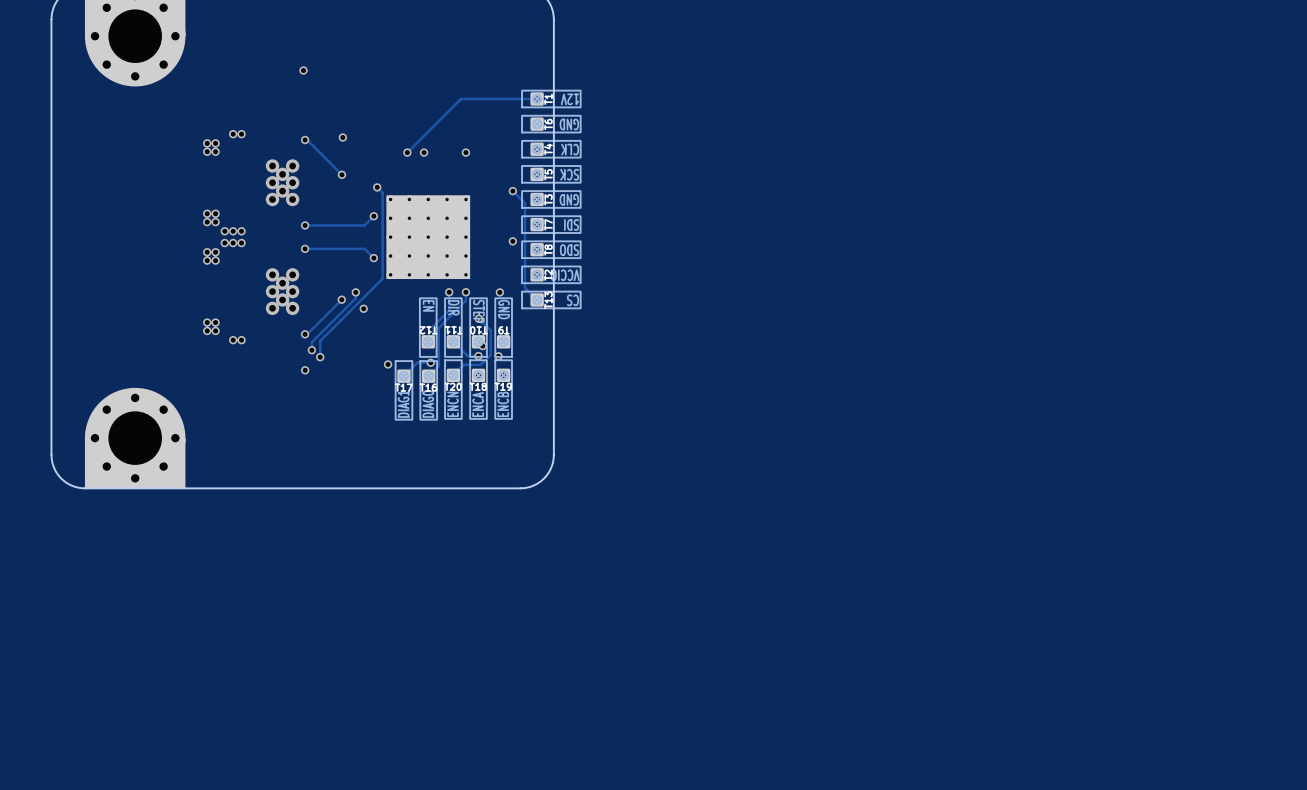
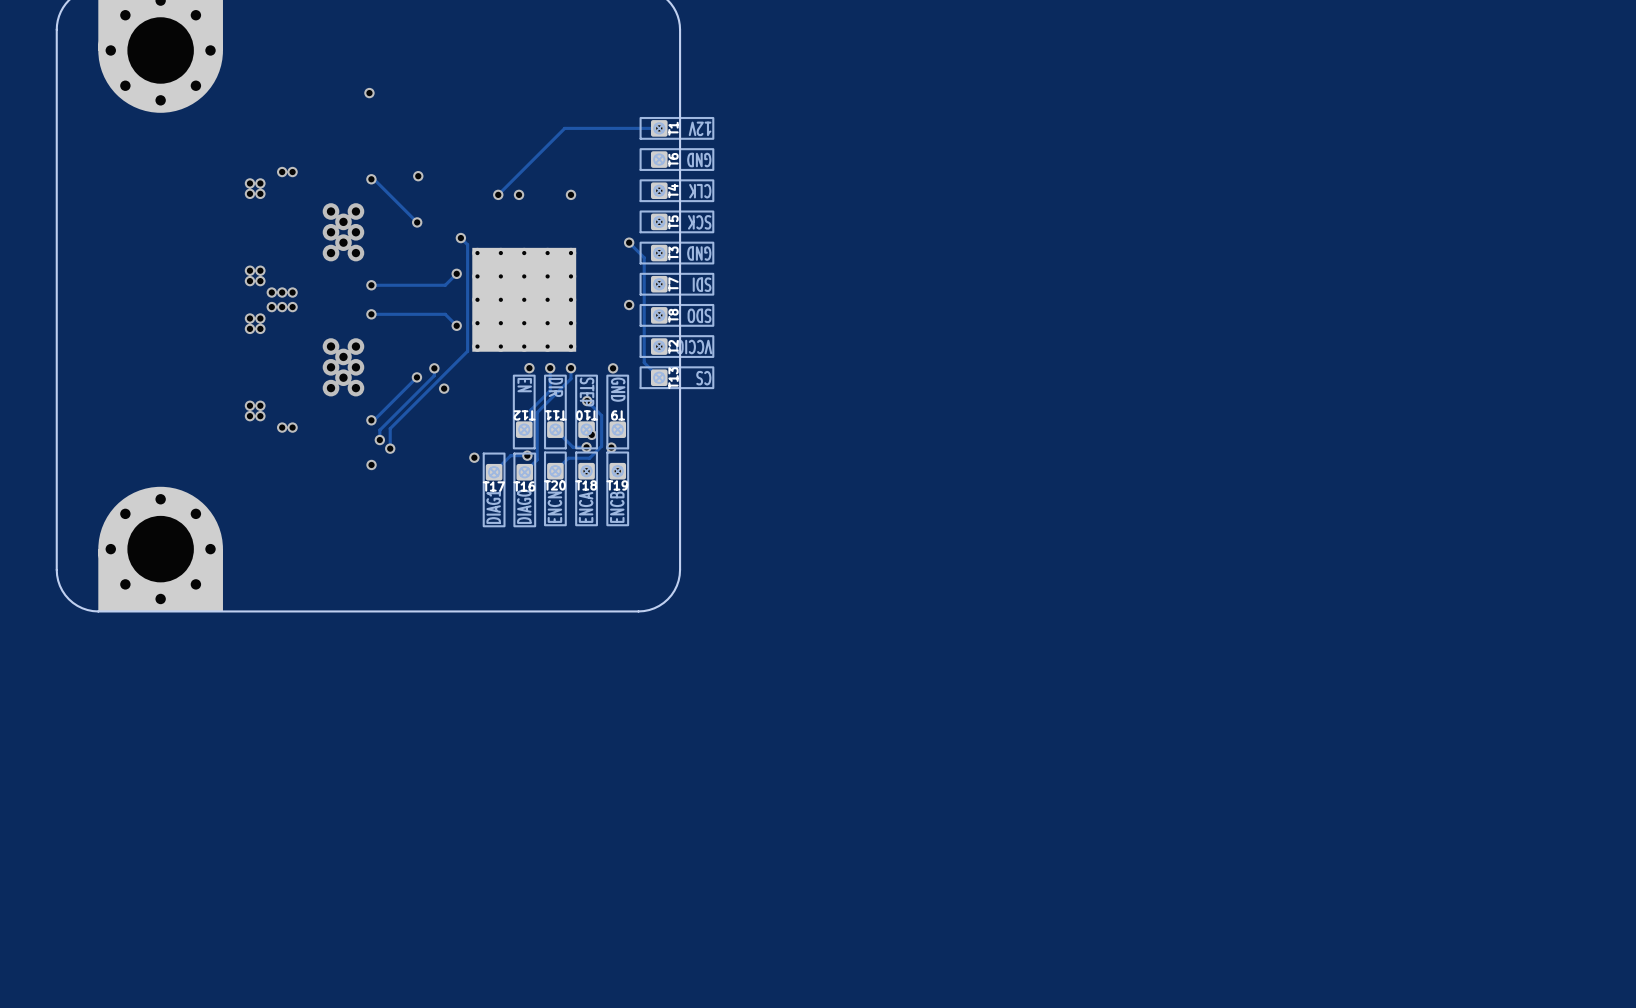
via: none -> (529, 368)

